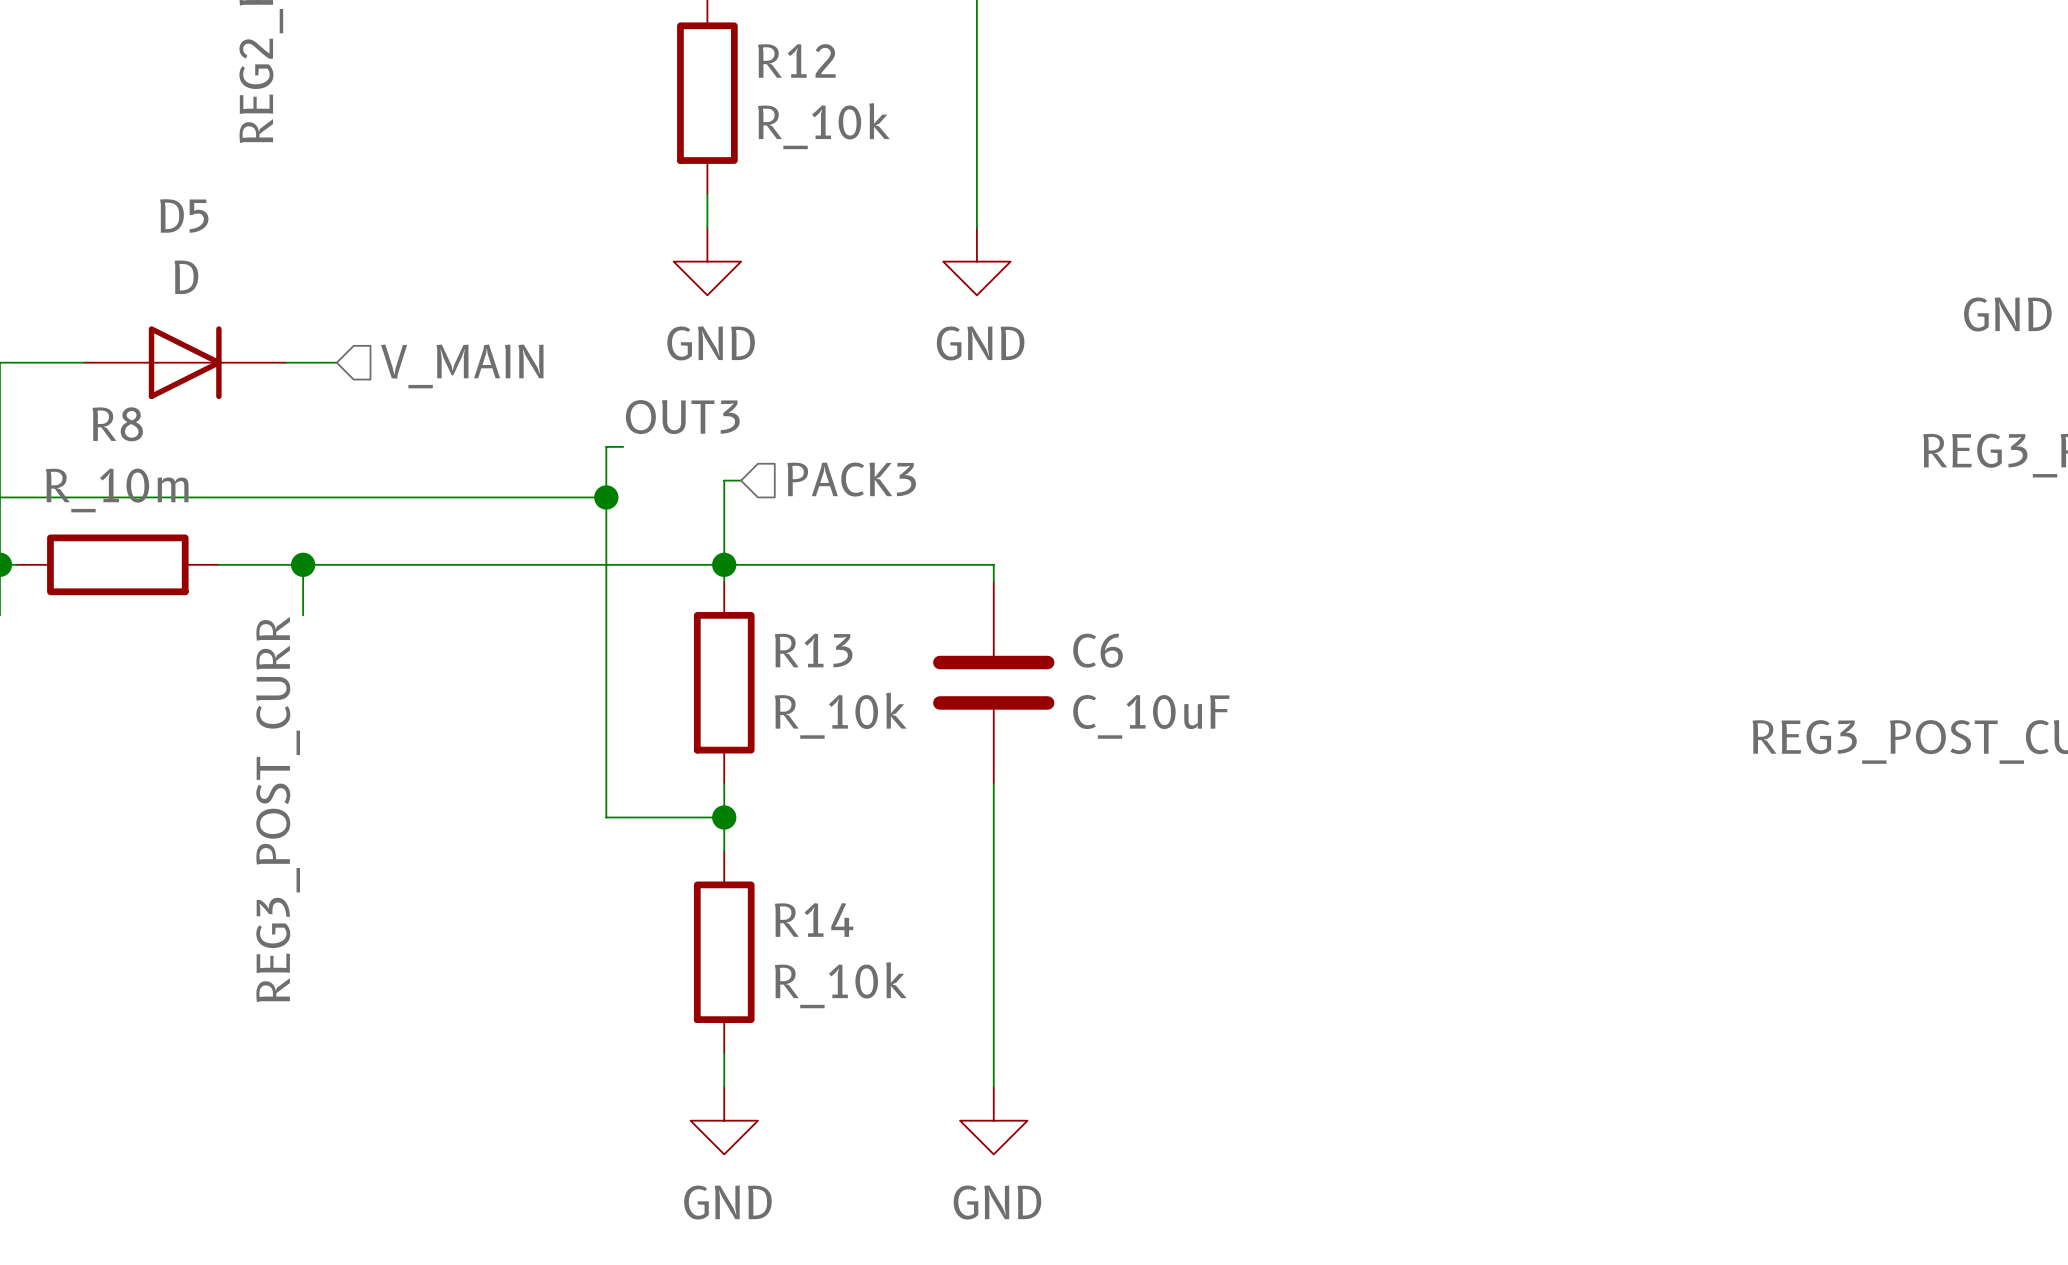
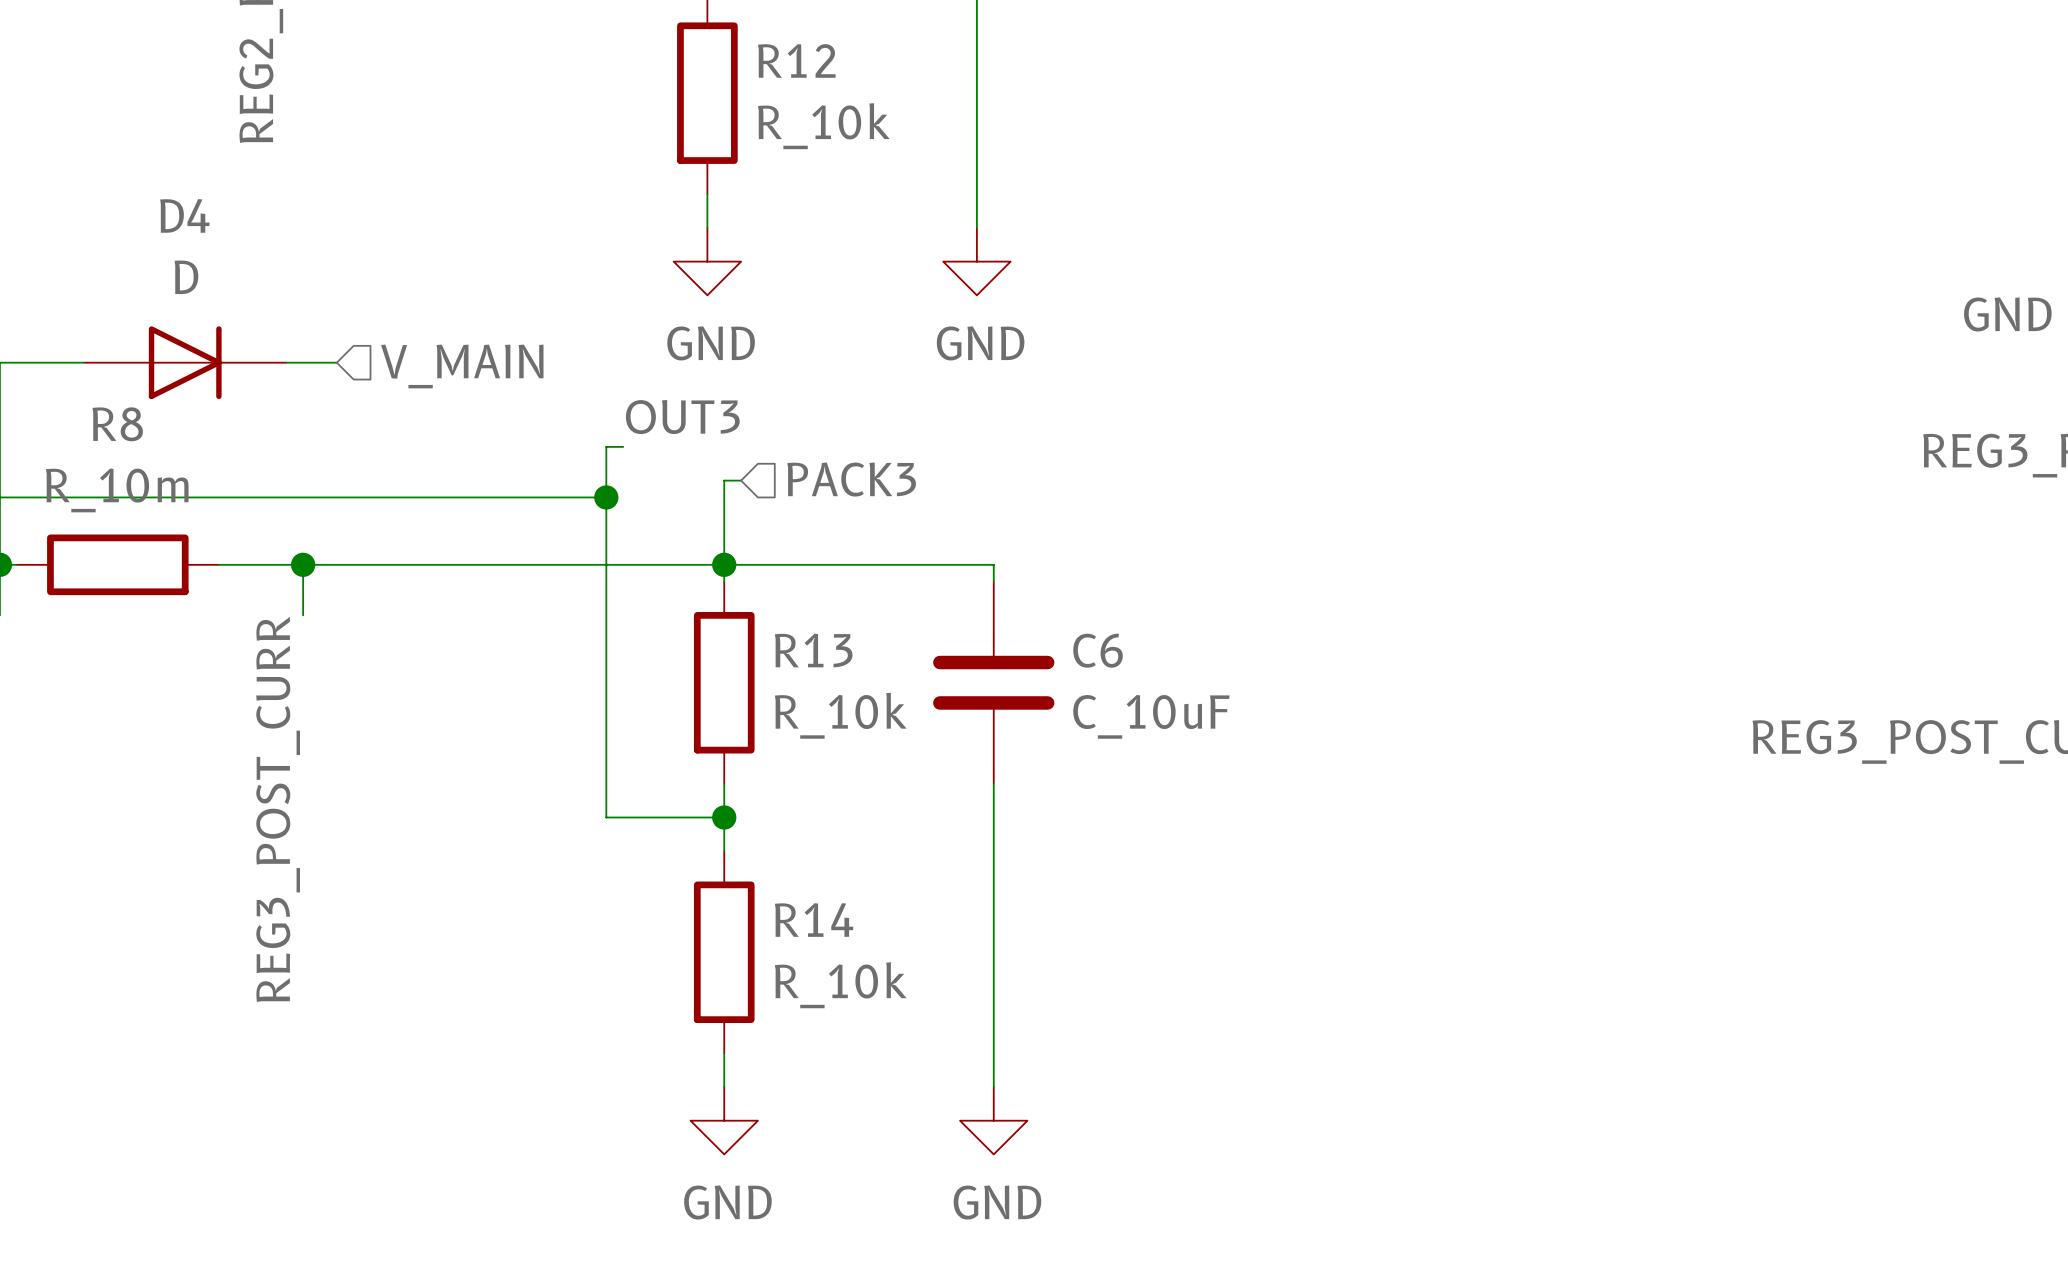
D5 name: D5 (184, 215) -> D4 (184, 215)

